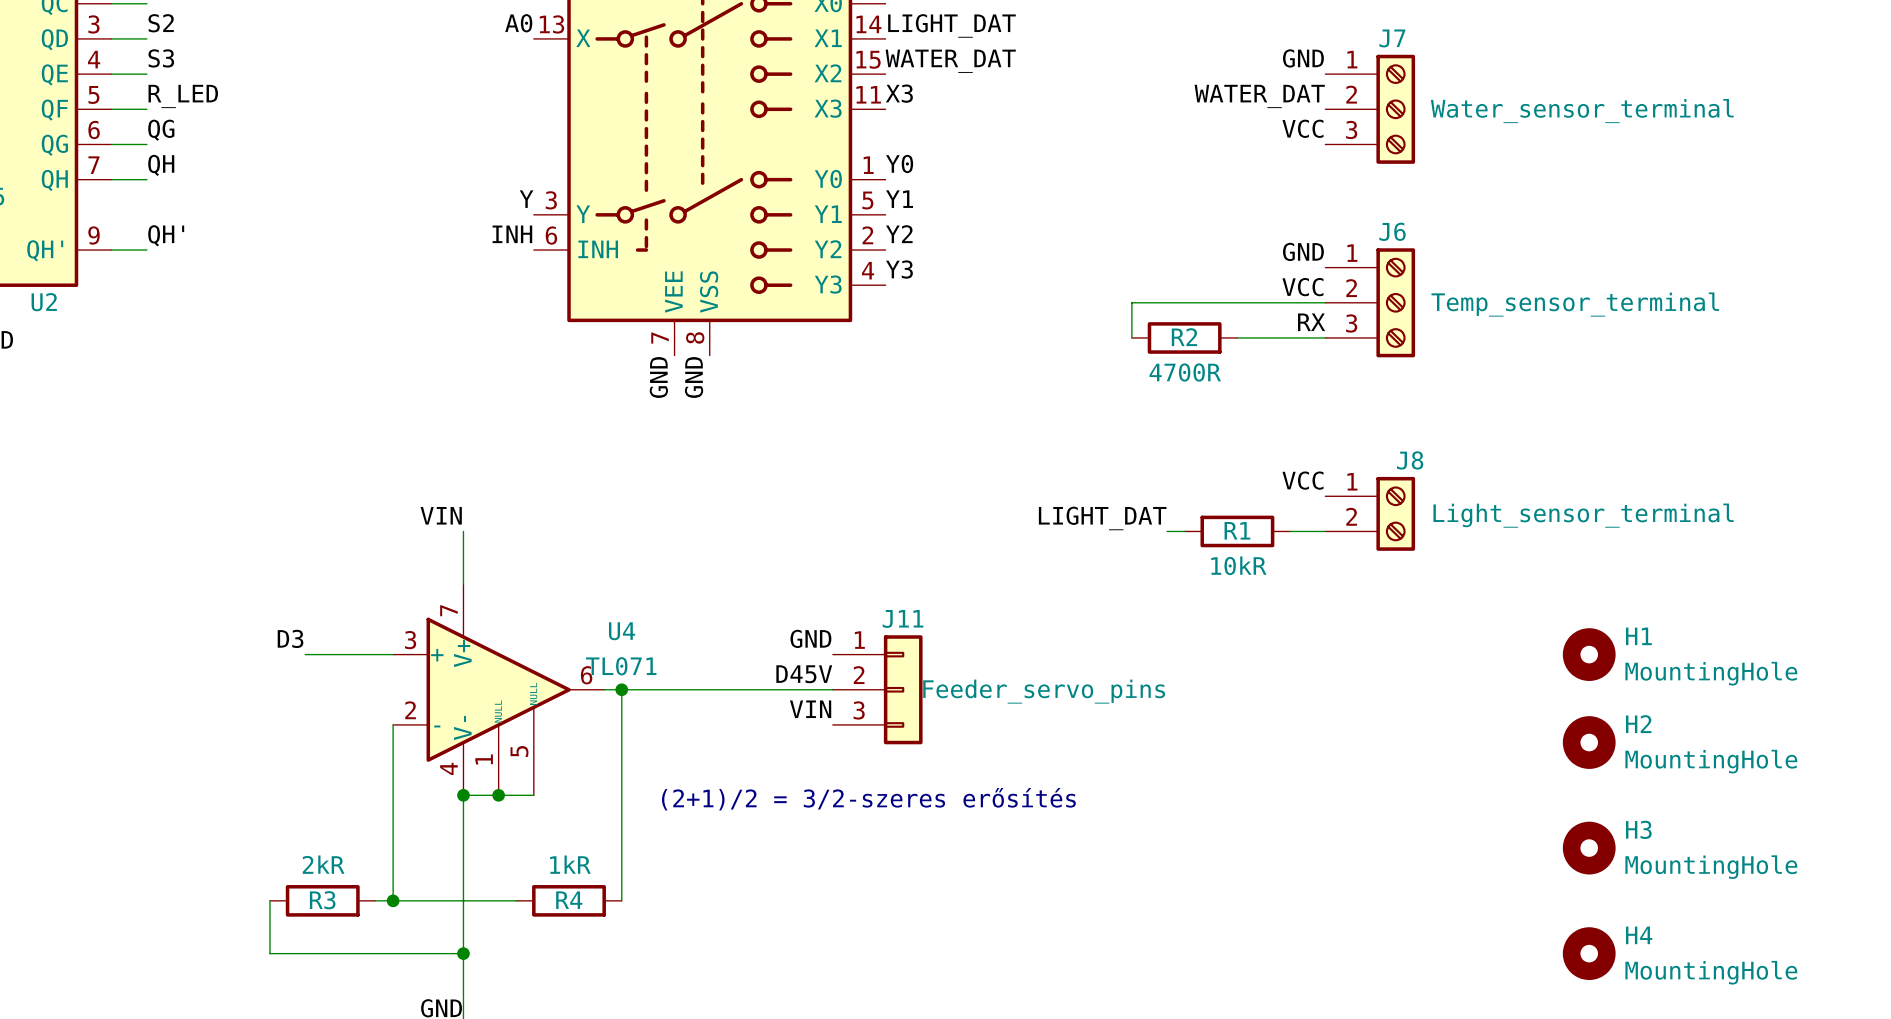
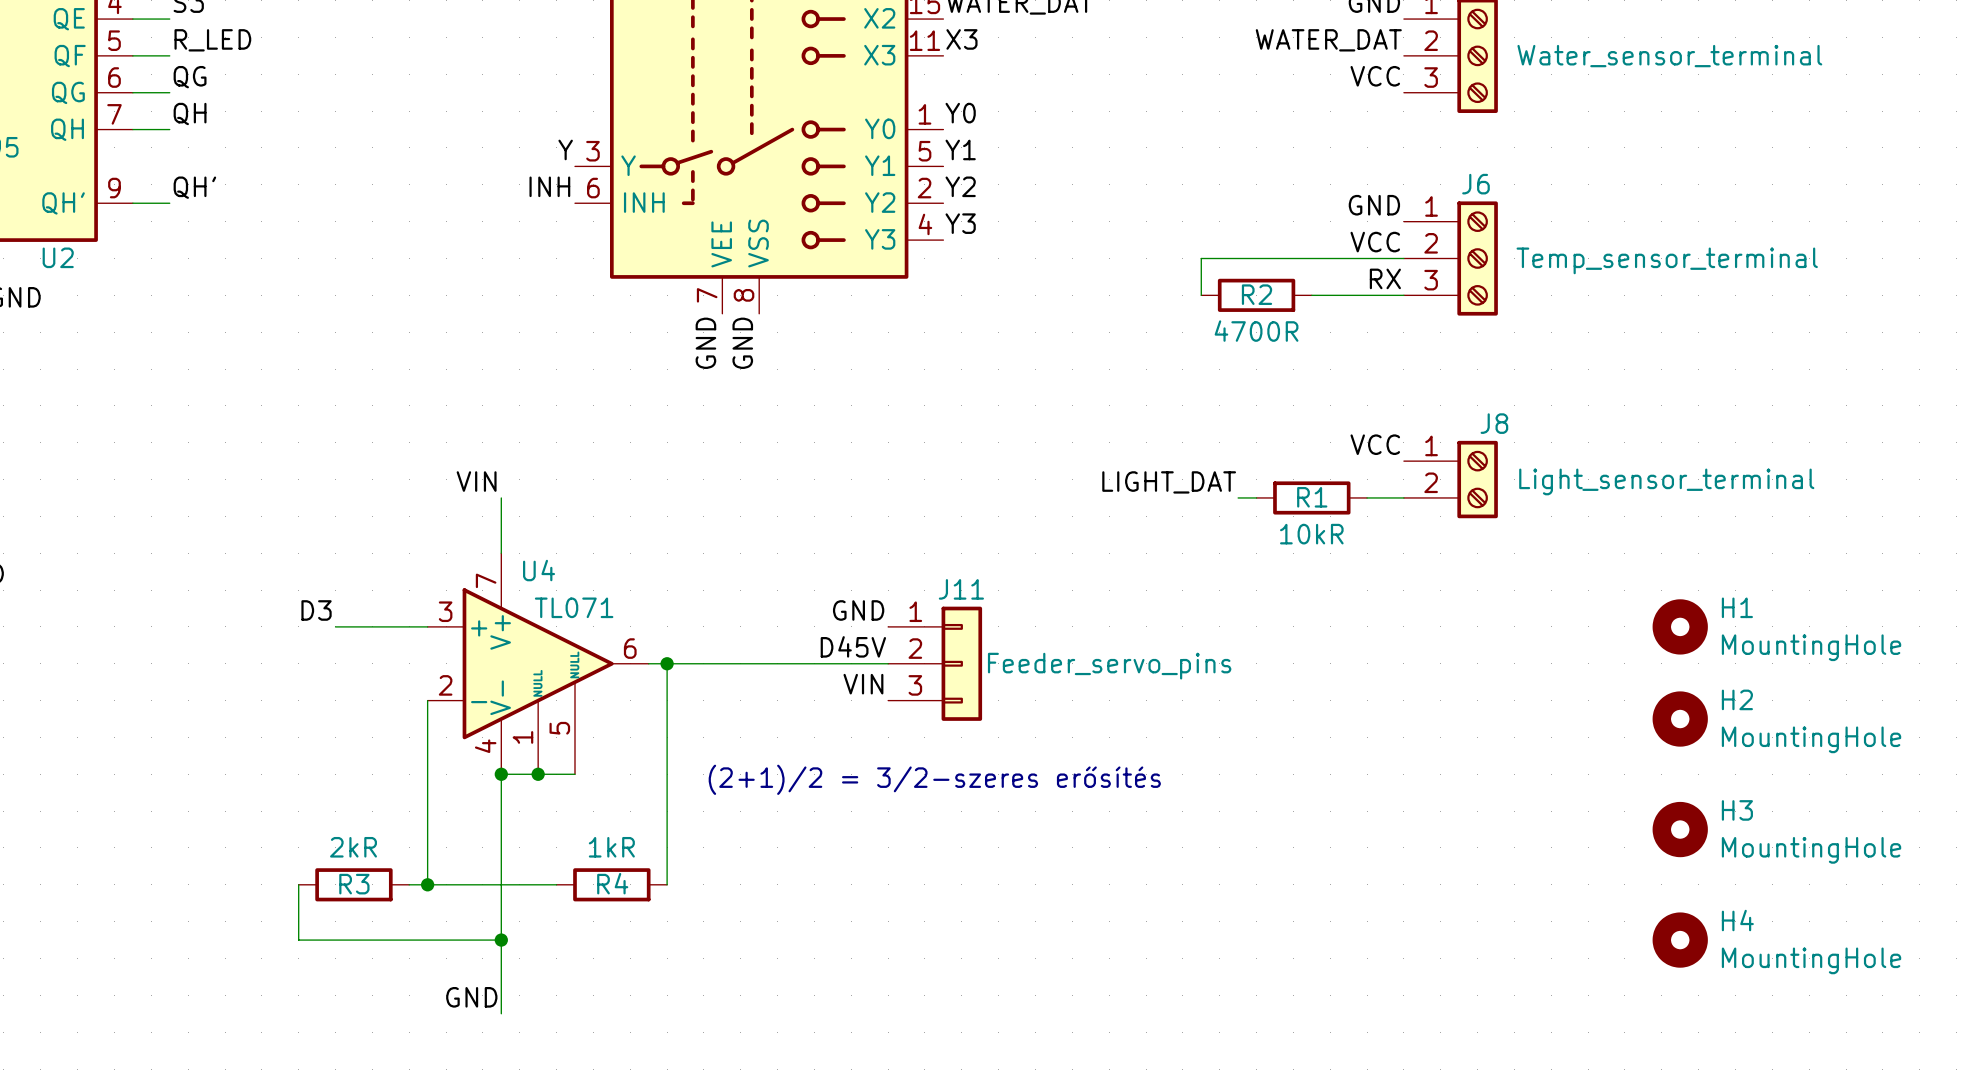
U4 name position: U4 (622, 631) -> U4 (539, 570)
U4 value position: TL071 (621, 666) -> TL071 (574, 607)

